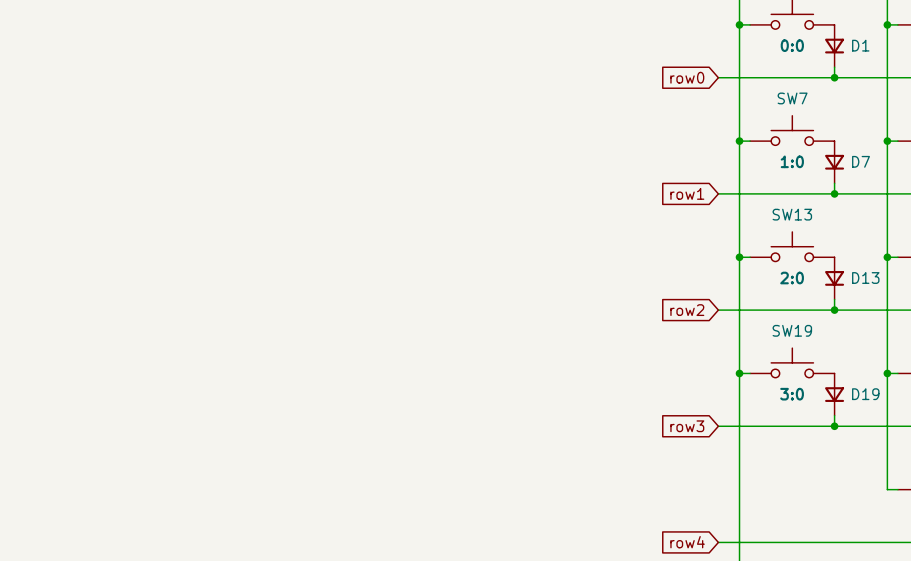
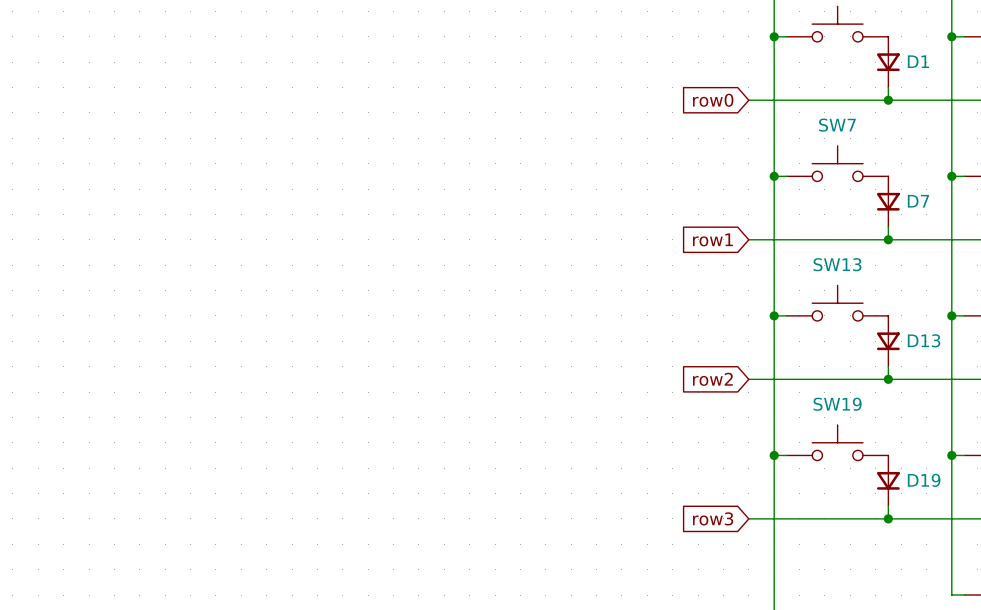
part value: 0:0 (792, 45) -> none
SW7 value: 1:0 (792, 161) -> none
SW13 value: 2:0 (792, 278) -> none
SW19 value: 3:0 (792, 394) -> none

